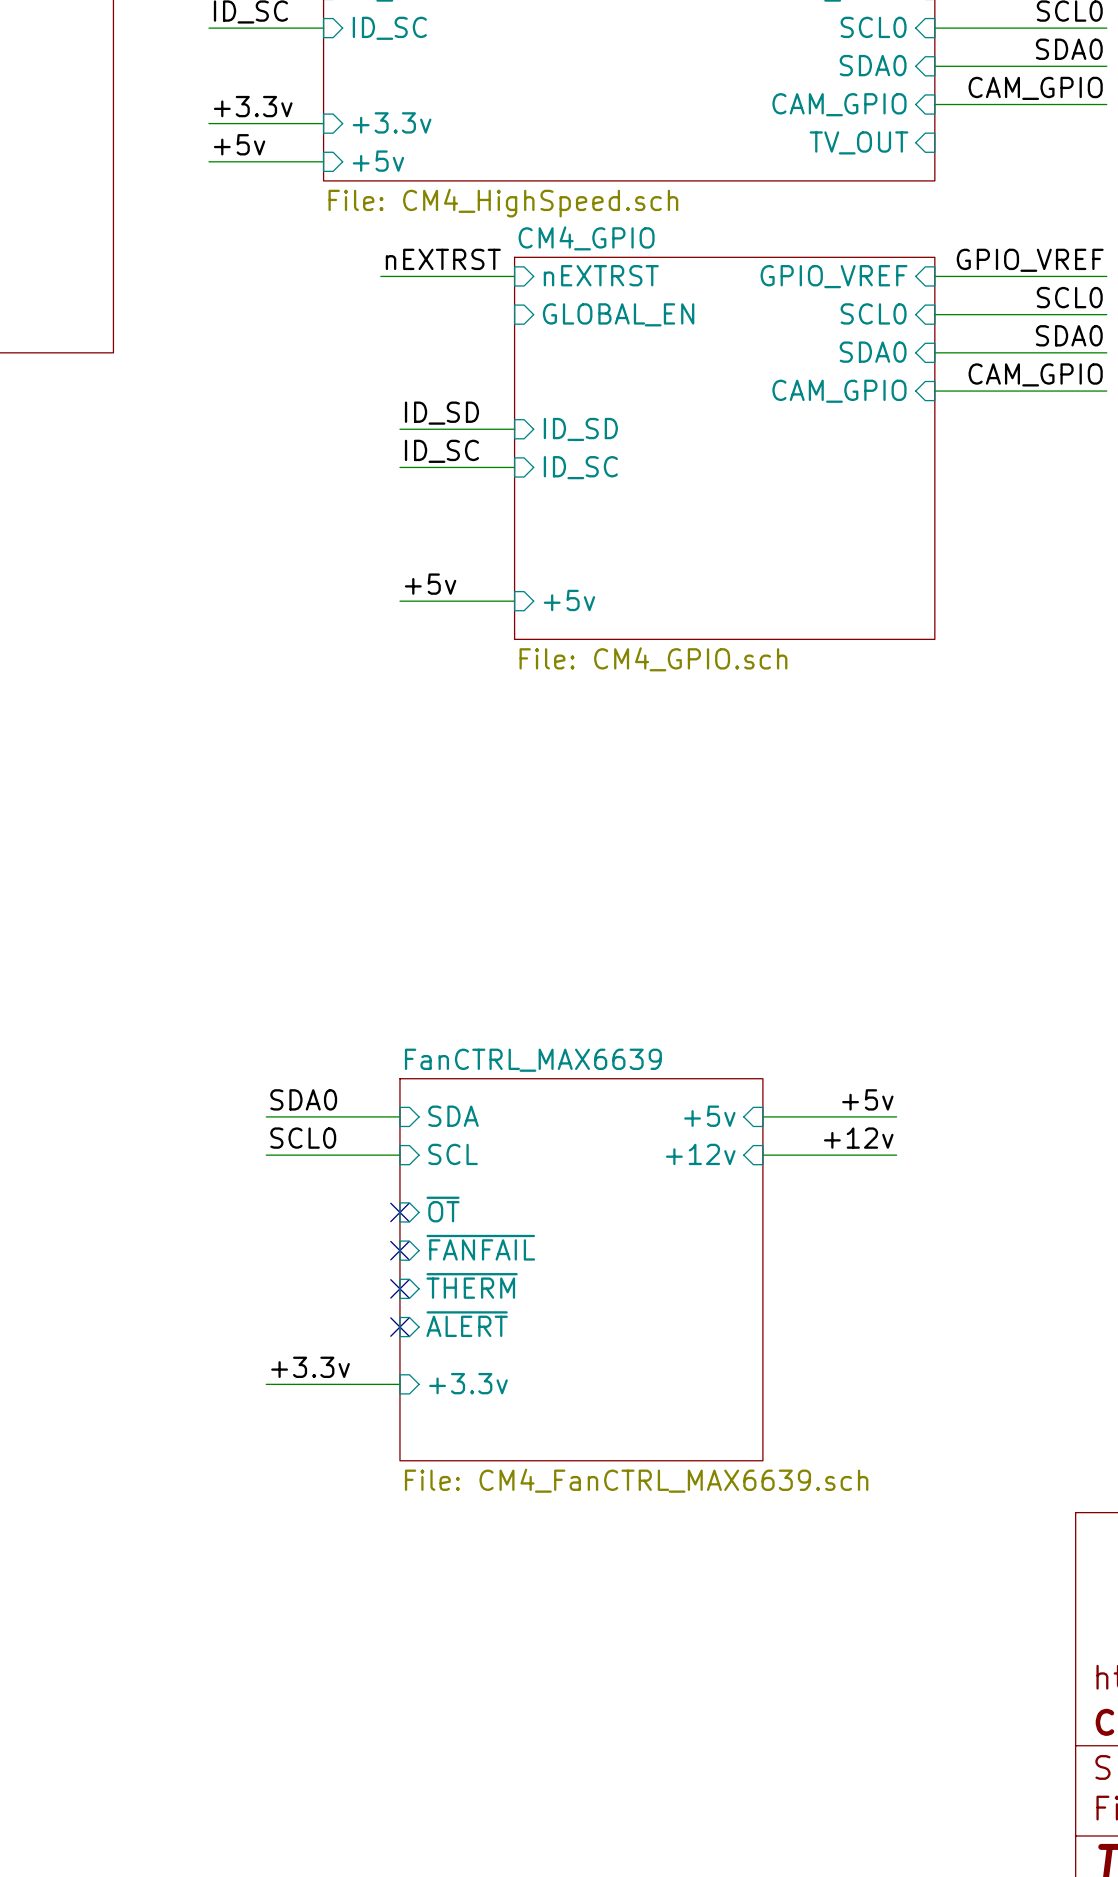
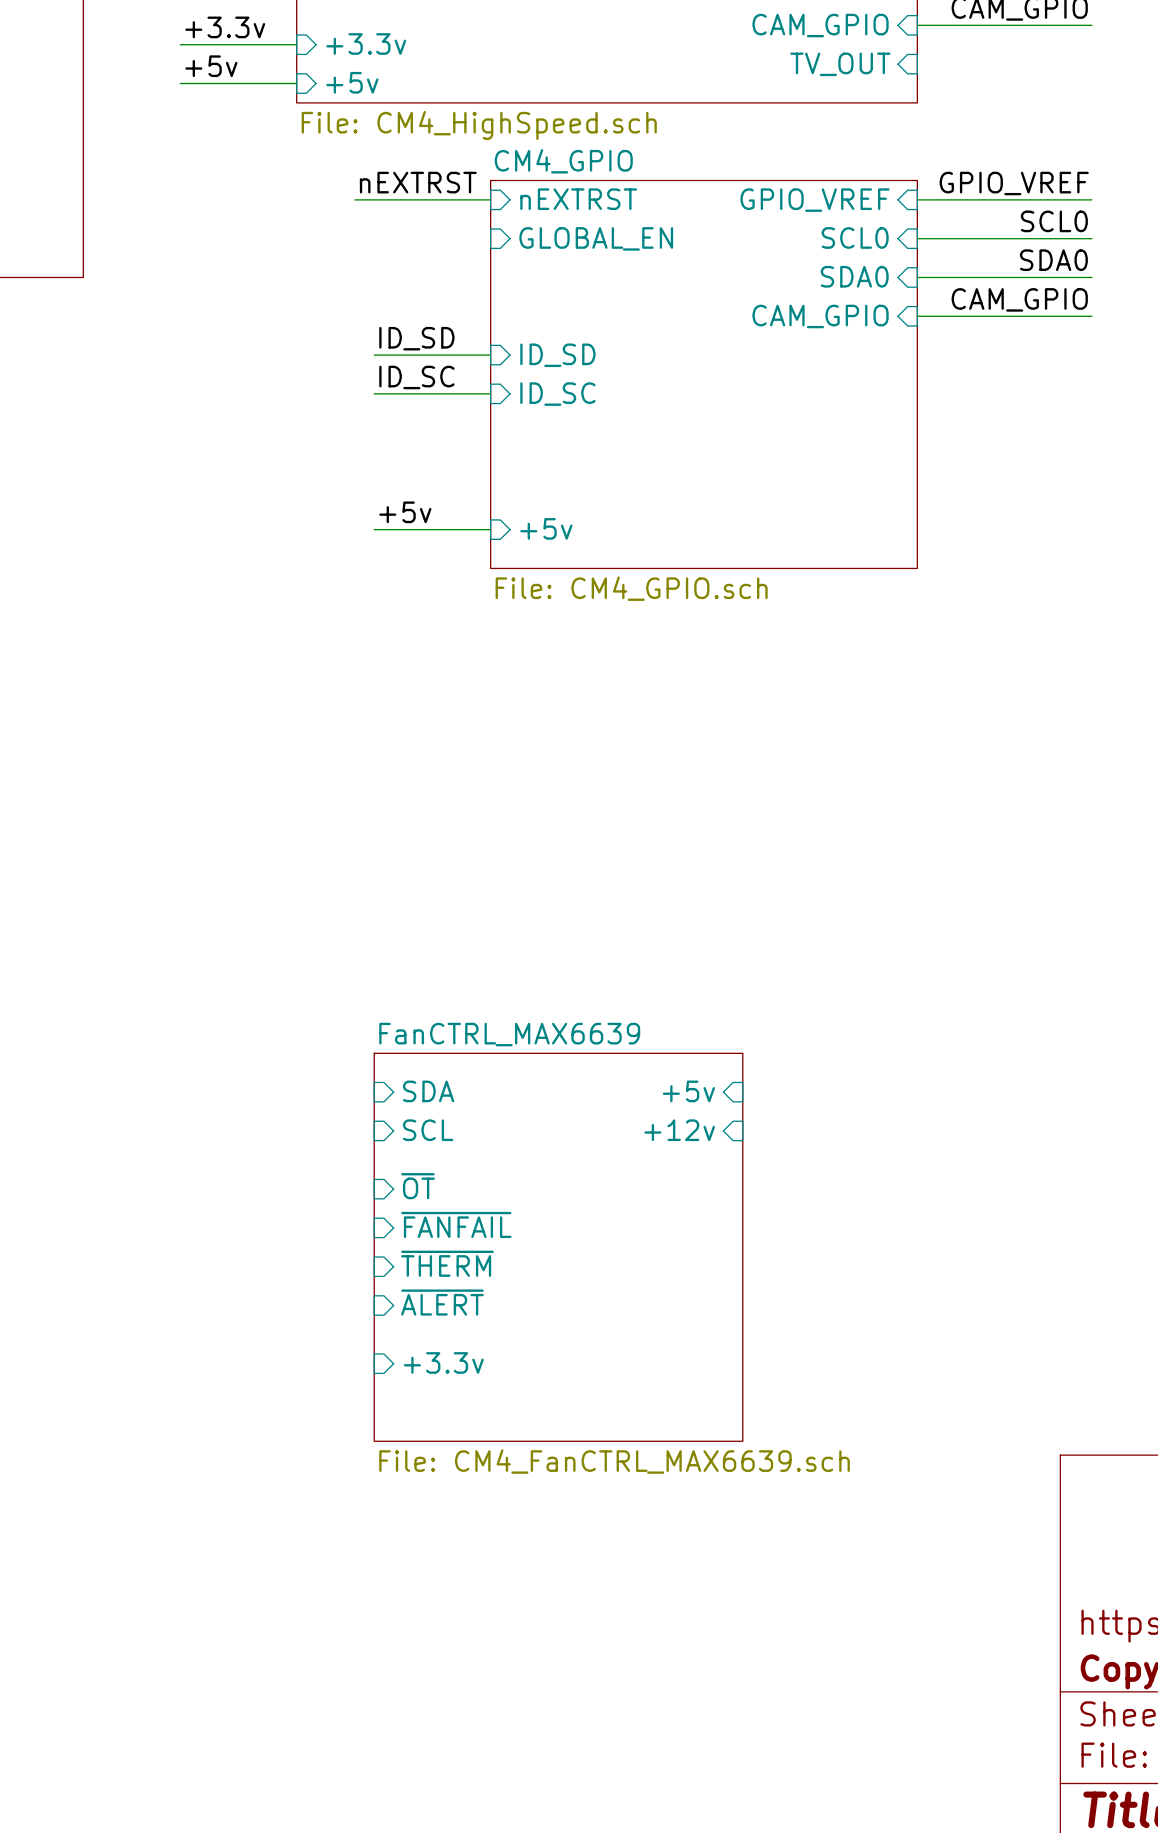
label: SDA0 (303, 1099) -> none
label: +5v (867, 1099) -> none
wire: (266, 1116) (399, 1116) -> none
sheet pin: SDA (453, 1116) -> none
sheet pin: +5v (709, 1116) -> none
wire: (762, 1116) (896, 1116) -> none
label: SCL0 (303, 1138) -> none
label: +12v (858, 1138) -> none
sheet pin: SCL (453, 1154) -> SDA (428, 1091)
sheet pin: +12v (700, 1154) -> +5v (688, 1091)
wire: (266, 1155) (399, 1155) -> none
wire: (762, 1155) (896, 1155) -> none
sheet pin: none -> SCL (428, 1130)
sheet pin: none -> +12v (679, 1130)
sheet pin: ~{OT} (443, 1209) -> none
no-connect mark: (399, 1212) -> none
sheet pin: ~{FANFAIL} (480, 1247) -> ~{OT} (418, 1186)
no-connect mark: (399, 1250) -> none
sheet FanCTRL_MAX6639 position: (581, 1269) -> (558, 1247)
sheet pin: ~{THERM} (472, 1285) -> ~{FANFAIL} (456, 1224)
no-connect mark: (399, 1288) -> none
sheet pin: ~{ALERT} (467, 1324) -> ~{THERM} (447, 1263)
no-connect mark: (399, 1327) -> none
sheet pin: none -> ~{ALERT} (442, 1302)
label: +3.3v (310, 1367) -> none
sheet pin position: +3.3v (468, 1383) -> +3.3v (443, 1362)
wire: (266, 1384) (399, 1384) -> none

